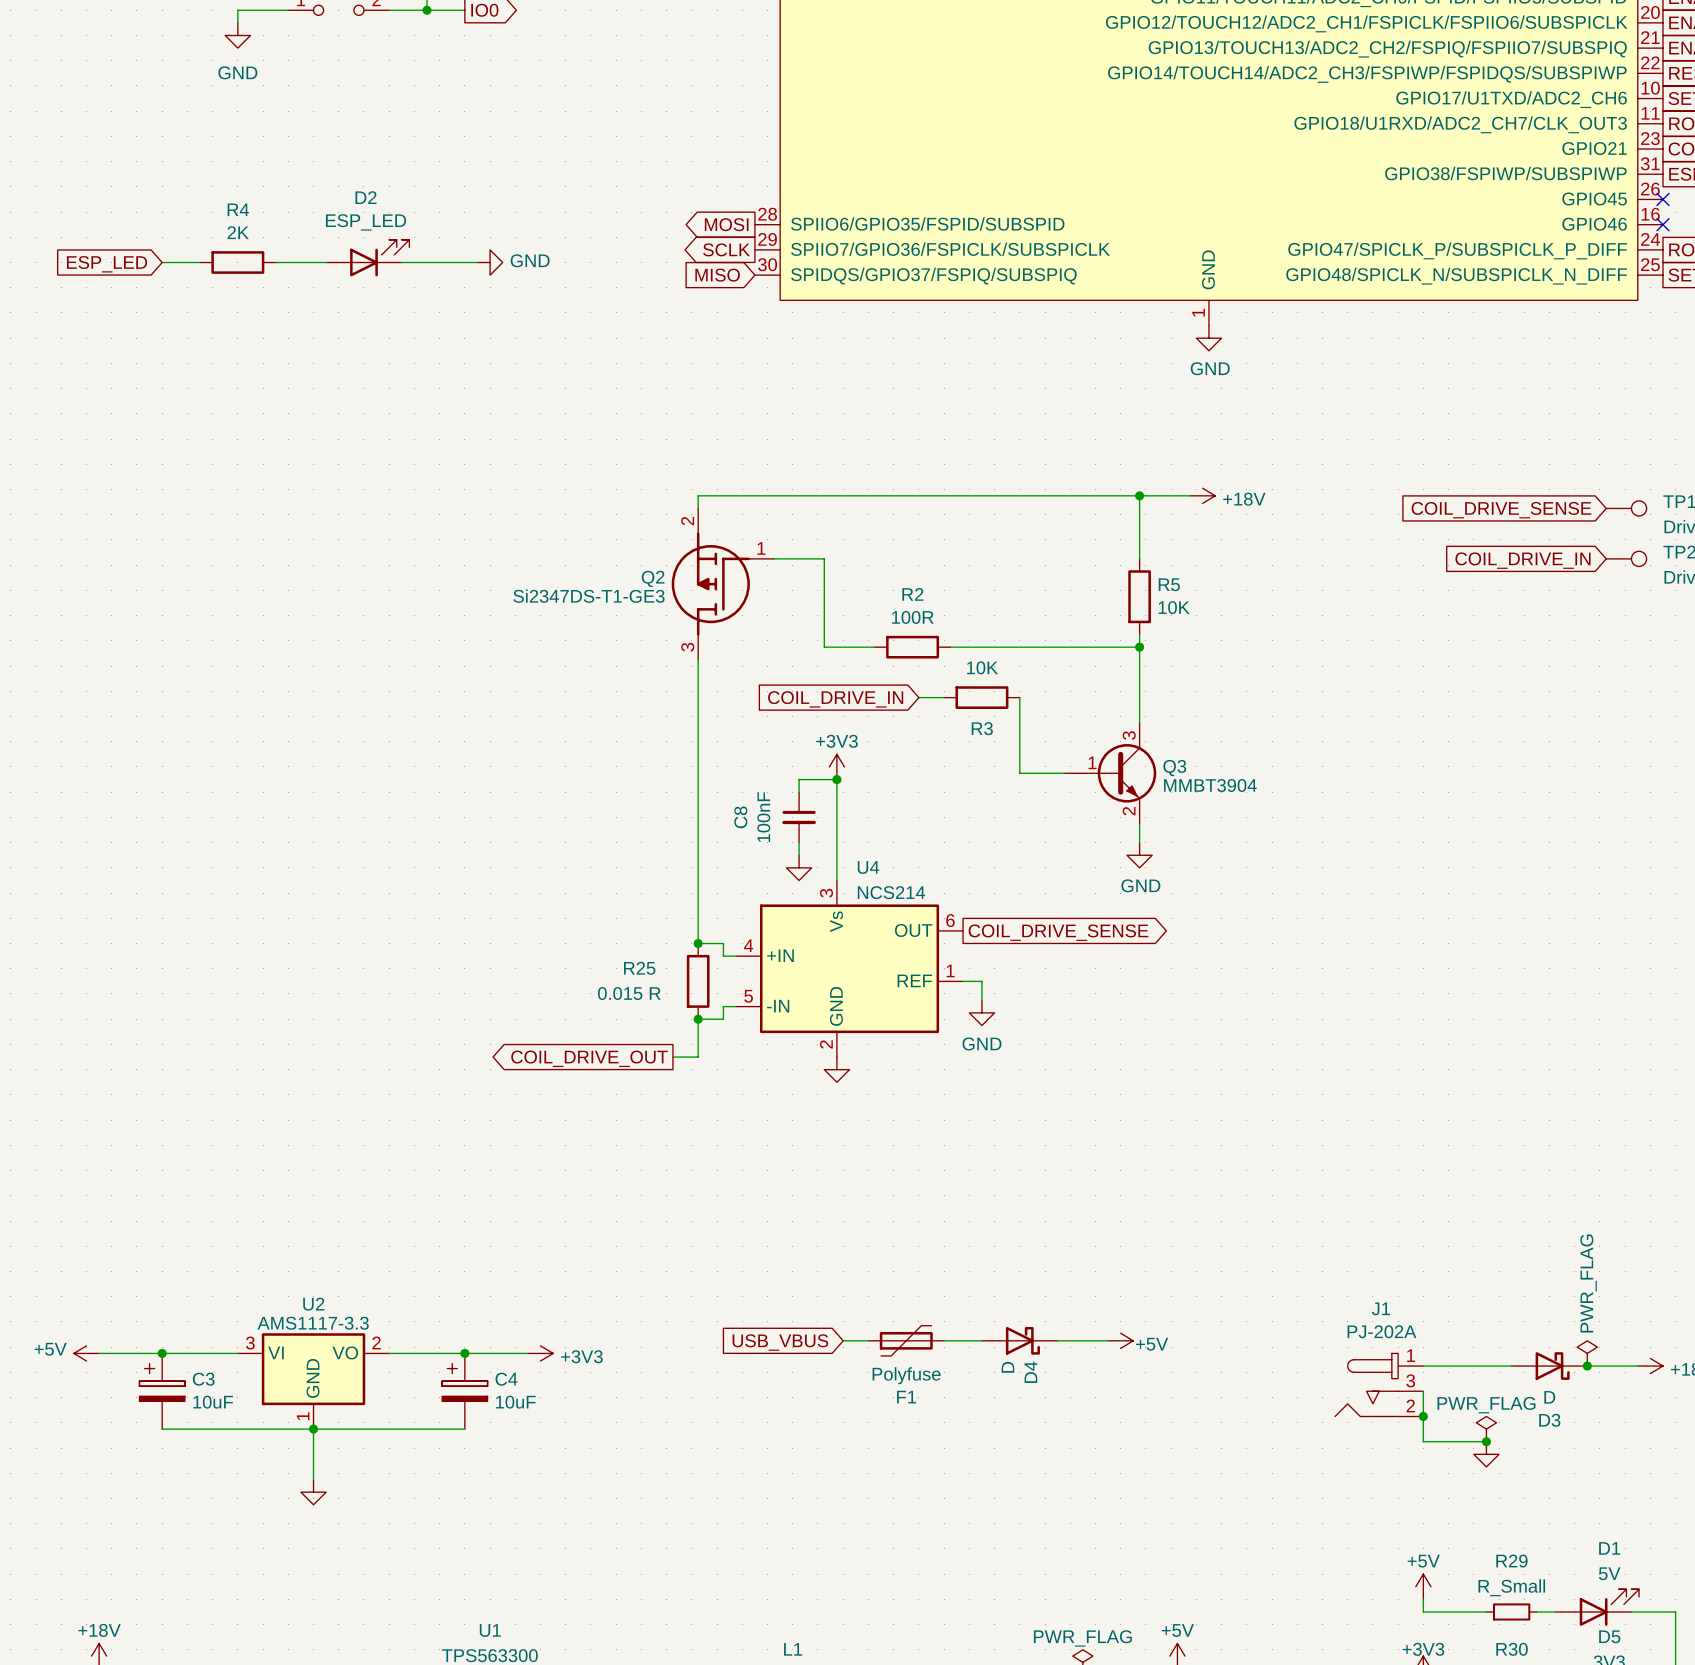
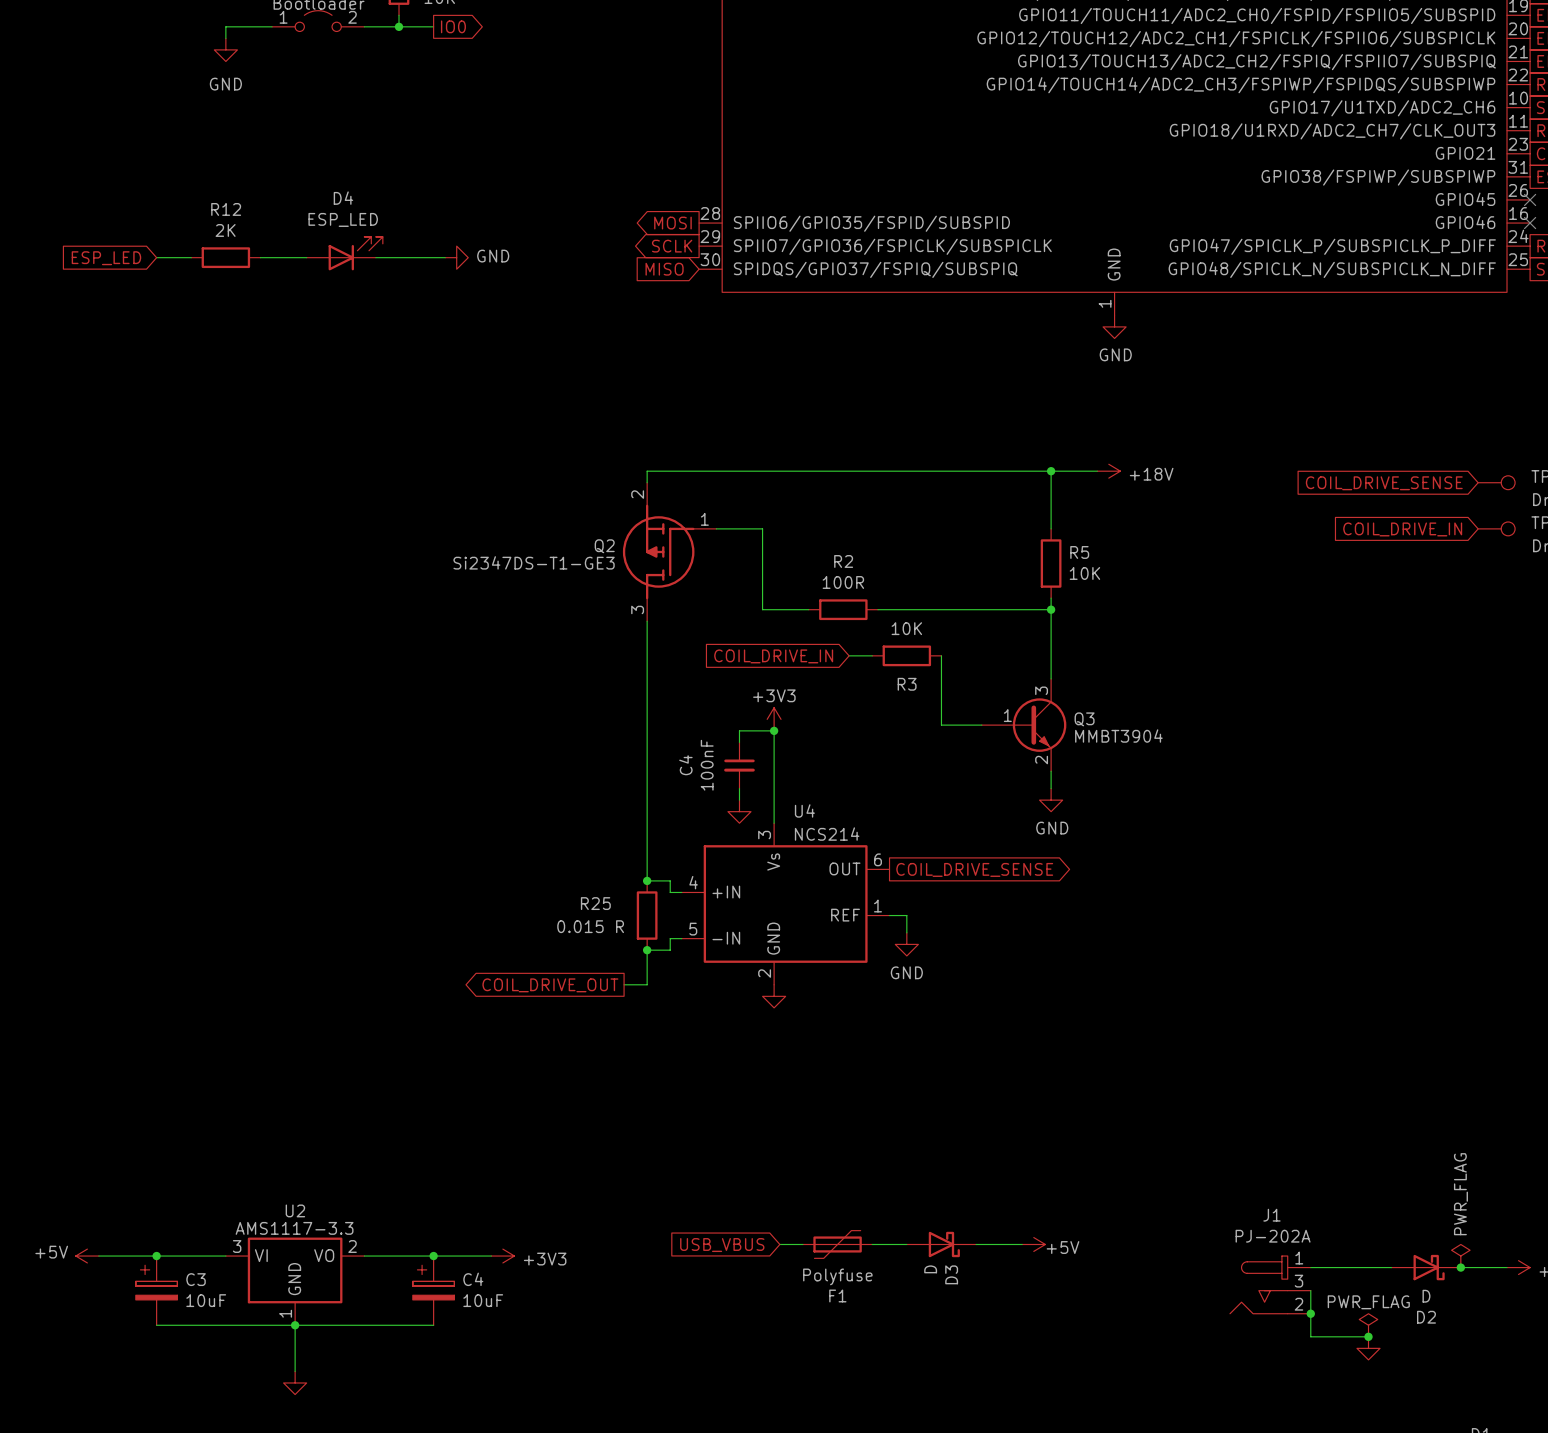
D2 name: D2 (366, 197) -> D4 (343, 198)
R4 name: R4 (238, 209) -> R12 (226, 209)
C8 name: C8 (740, 817) -> C4 (685, 765)
D4 name: D4 (1030, 1372) -> D3 (951, 1274)
D3 name: D3 (1549, 1420) -> D2 (1426, 1317)

